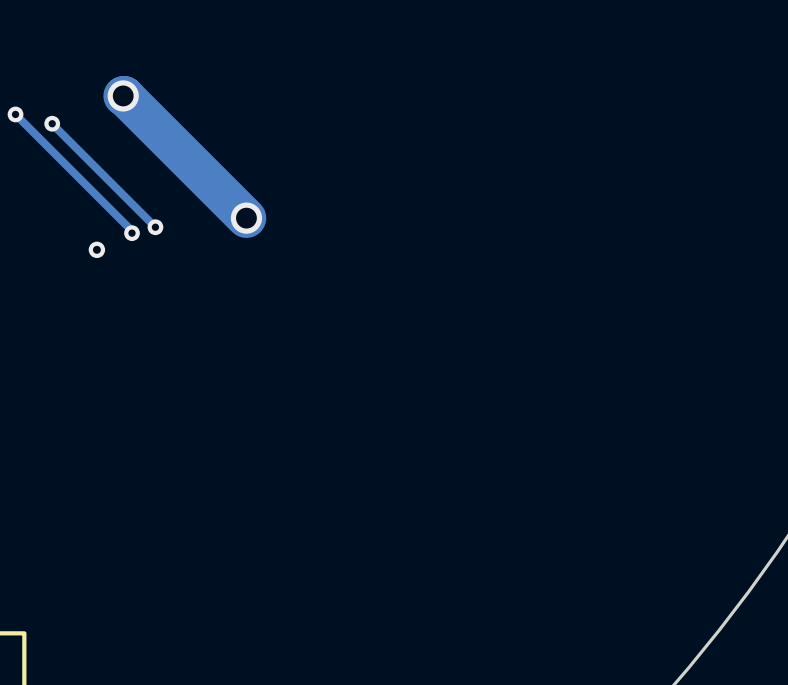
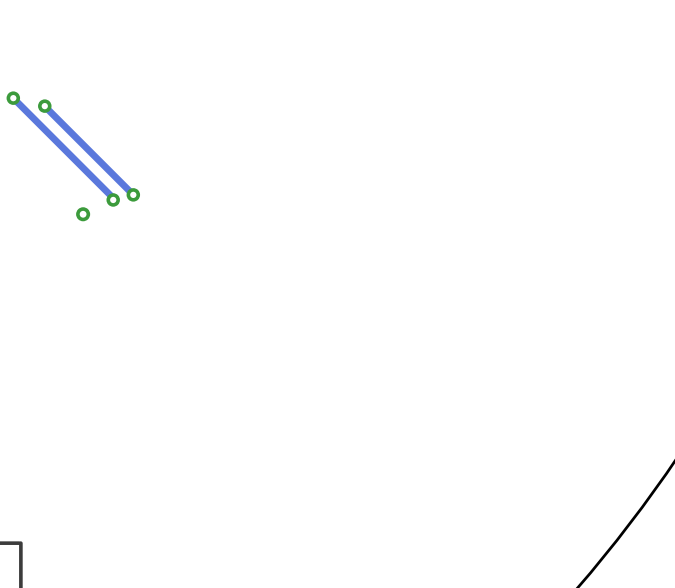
track: (123, 95) (246, 218) -> none
via: (123, 95) -> none
via: (246, 218) -> none

